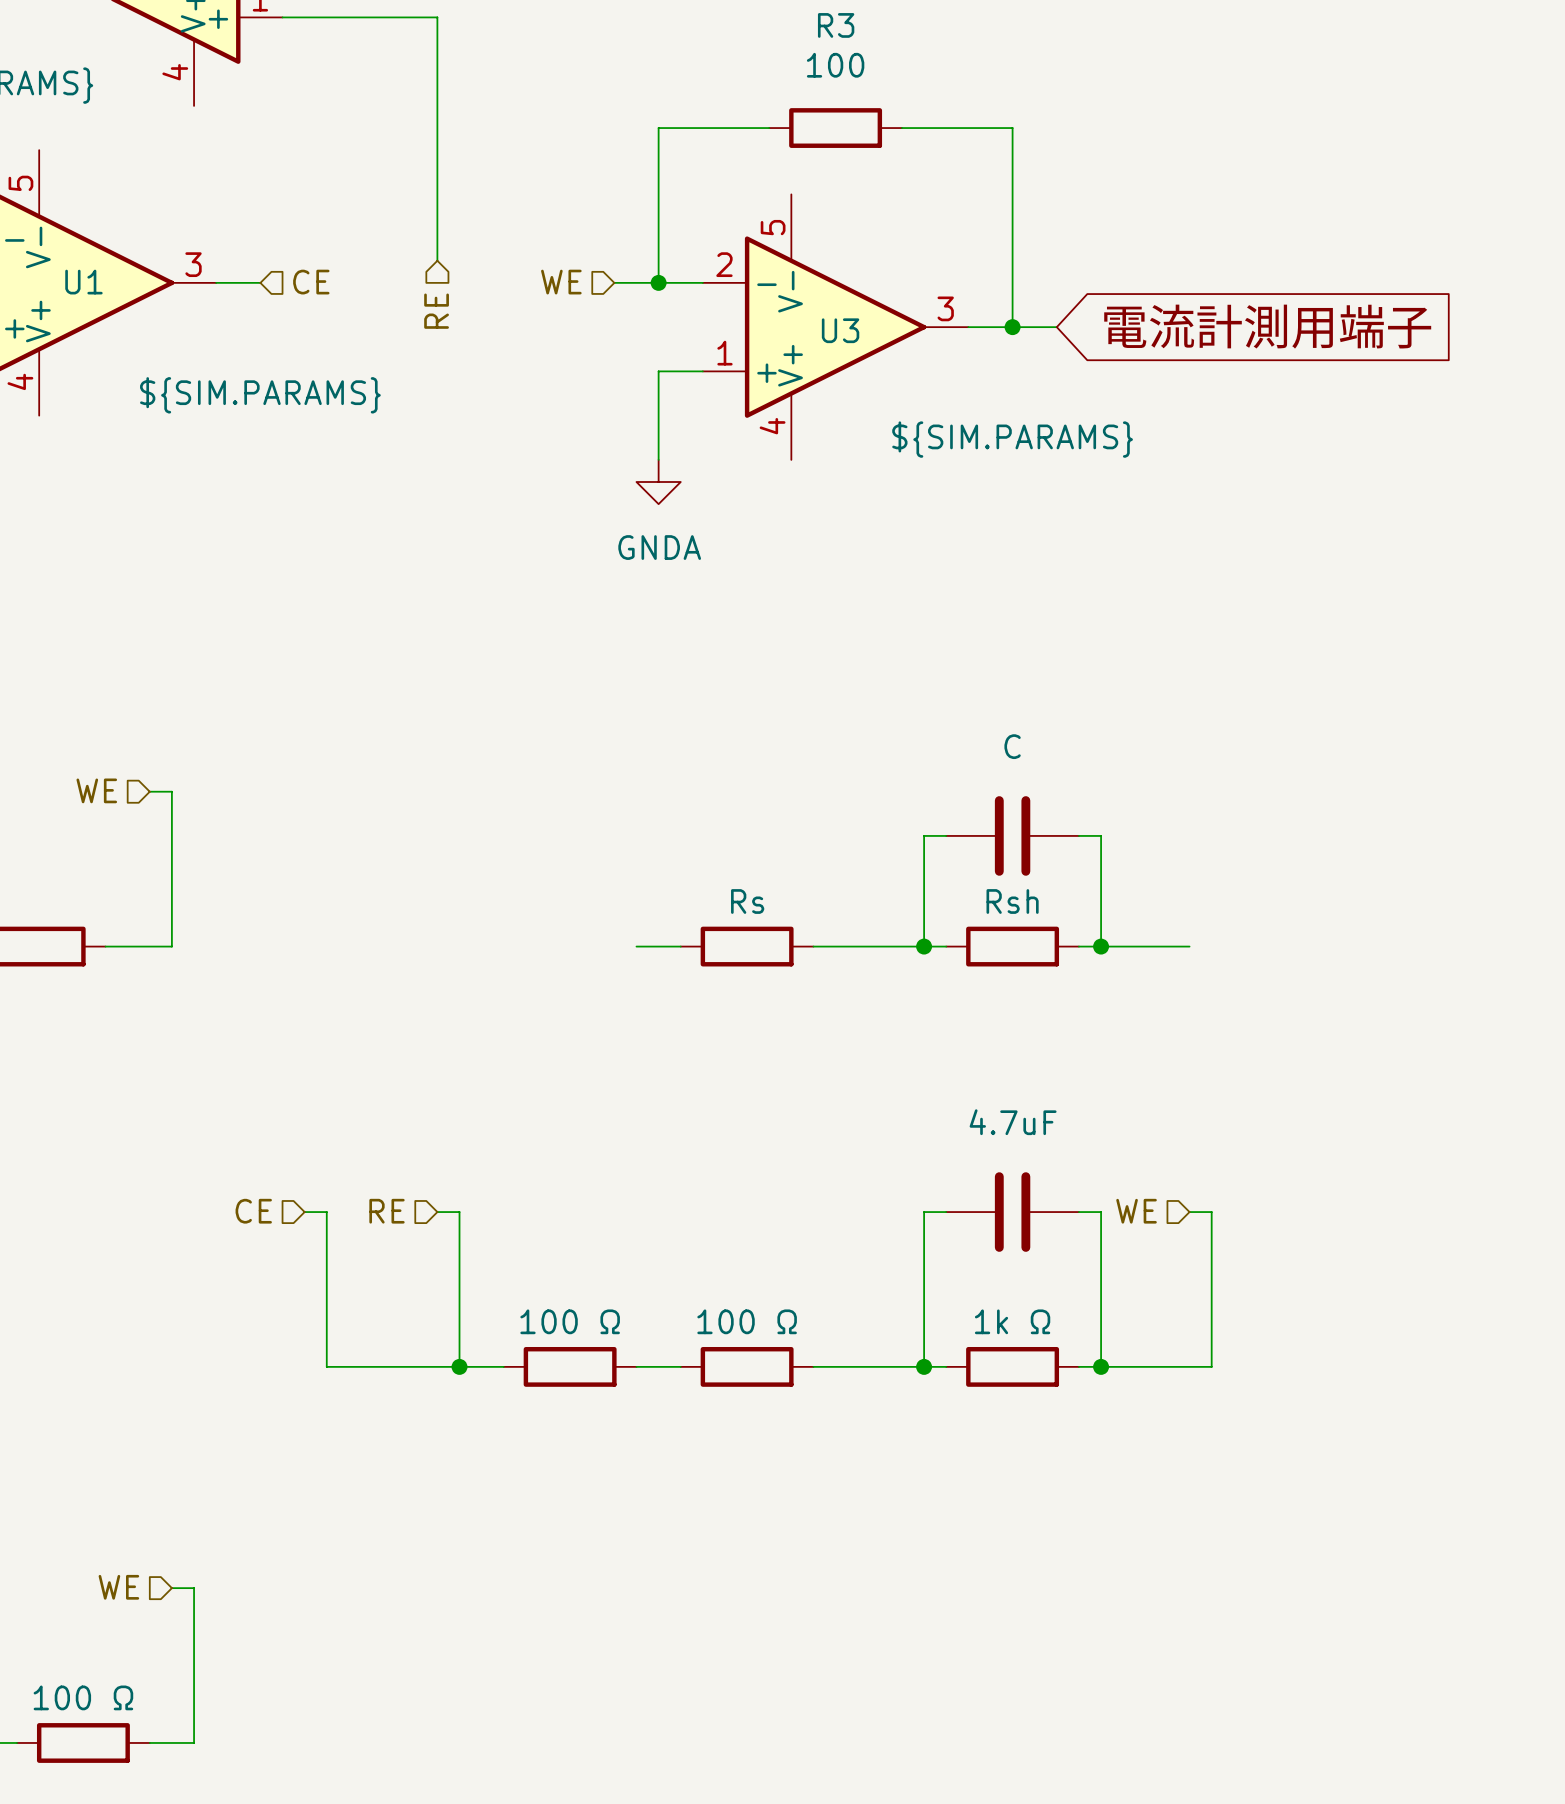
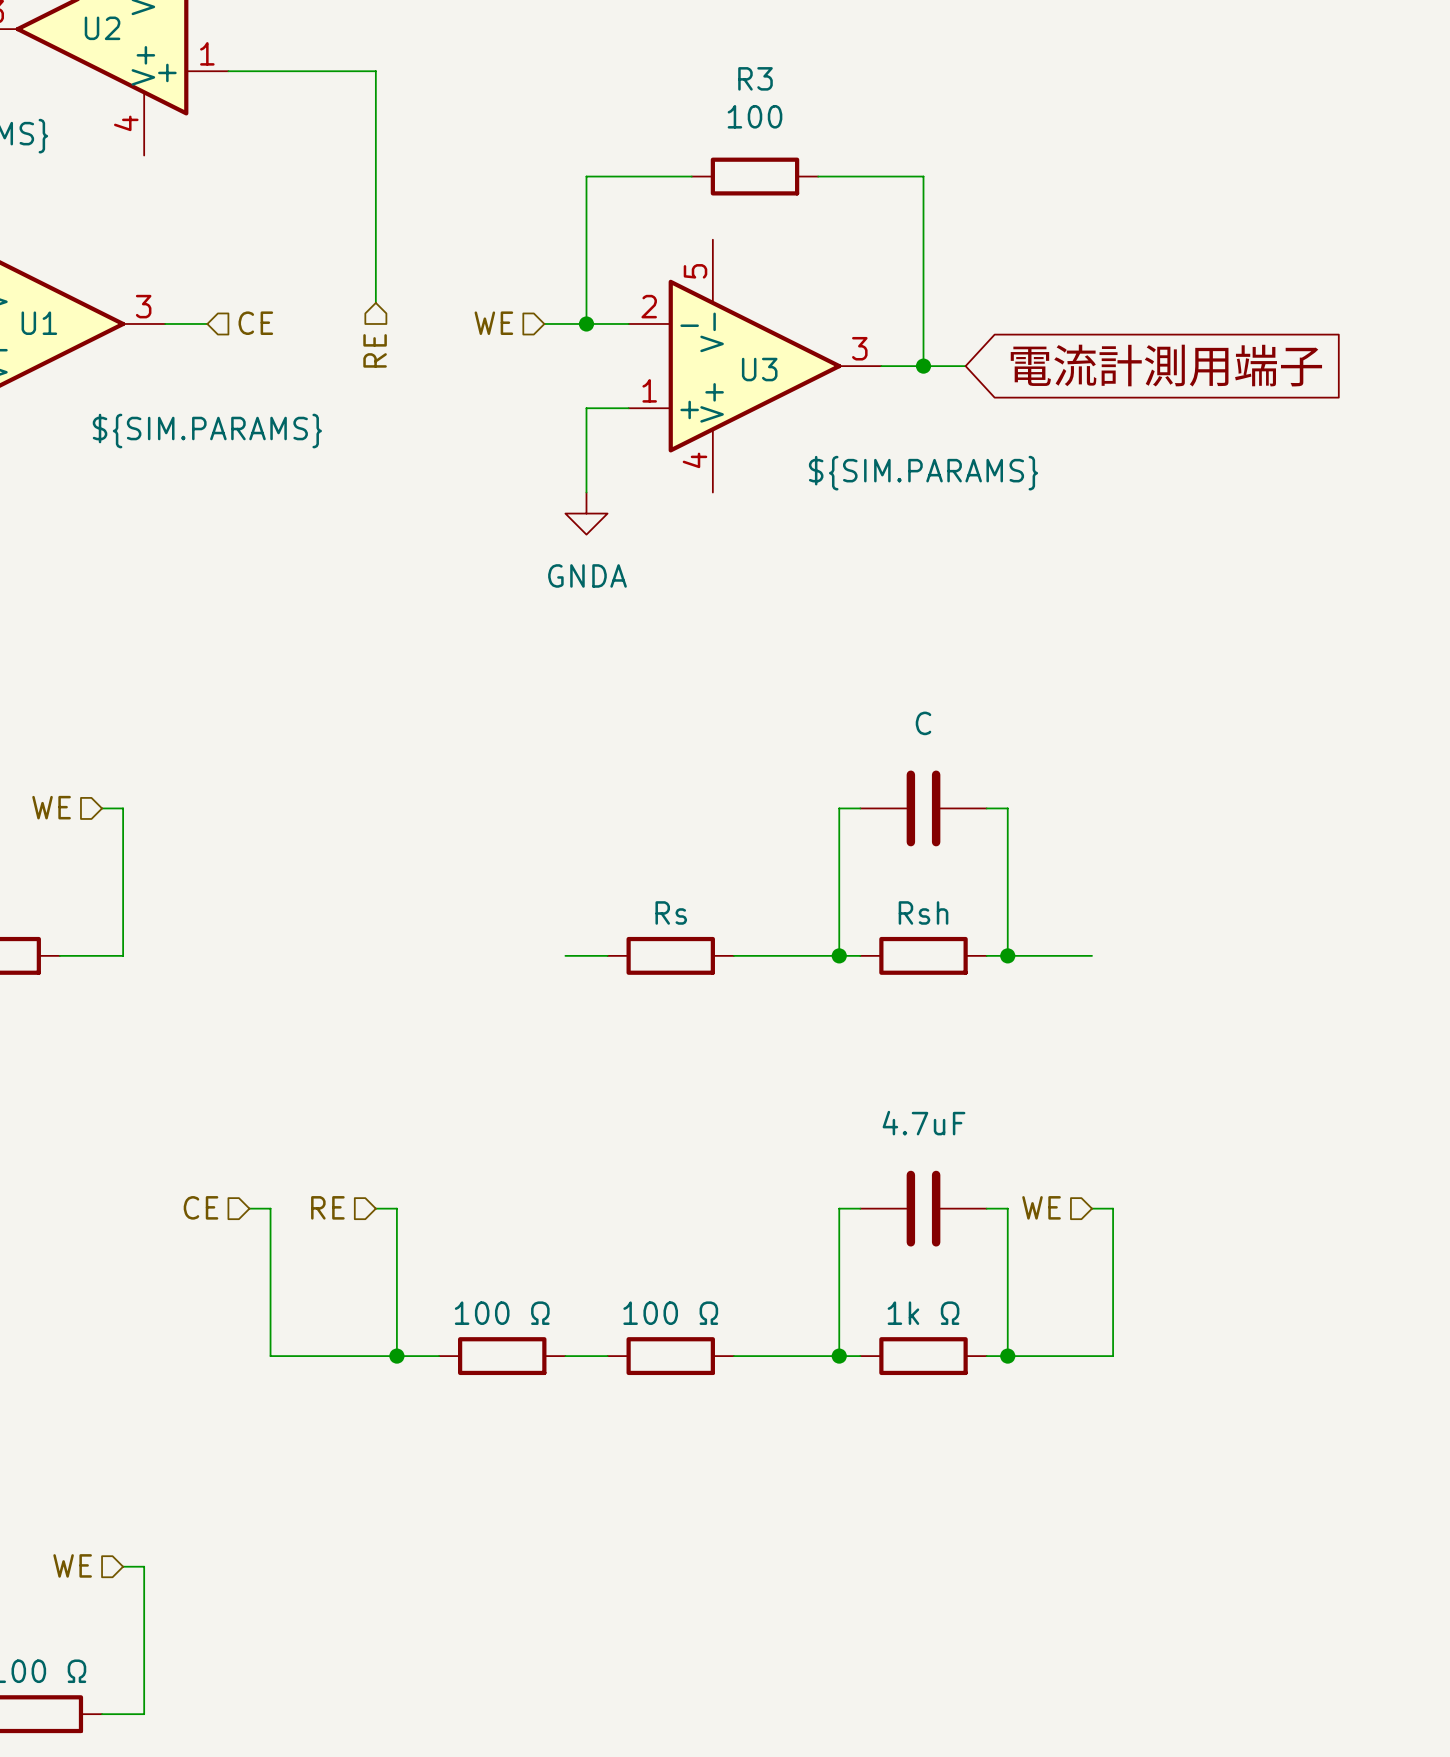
wire: (924, 835) (946, 835) -> (839, 850) (839, 808) (860, 808)
part position: (1012, 835) -> (923, 808)
wire: (1078, 835) (1101, 835) -> (986, 808) (1007, 808) (1007, 850)

